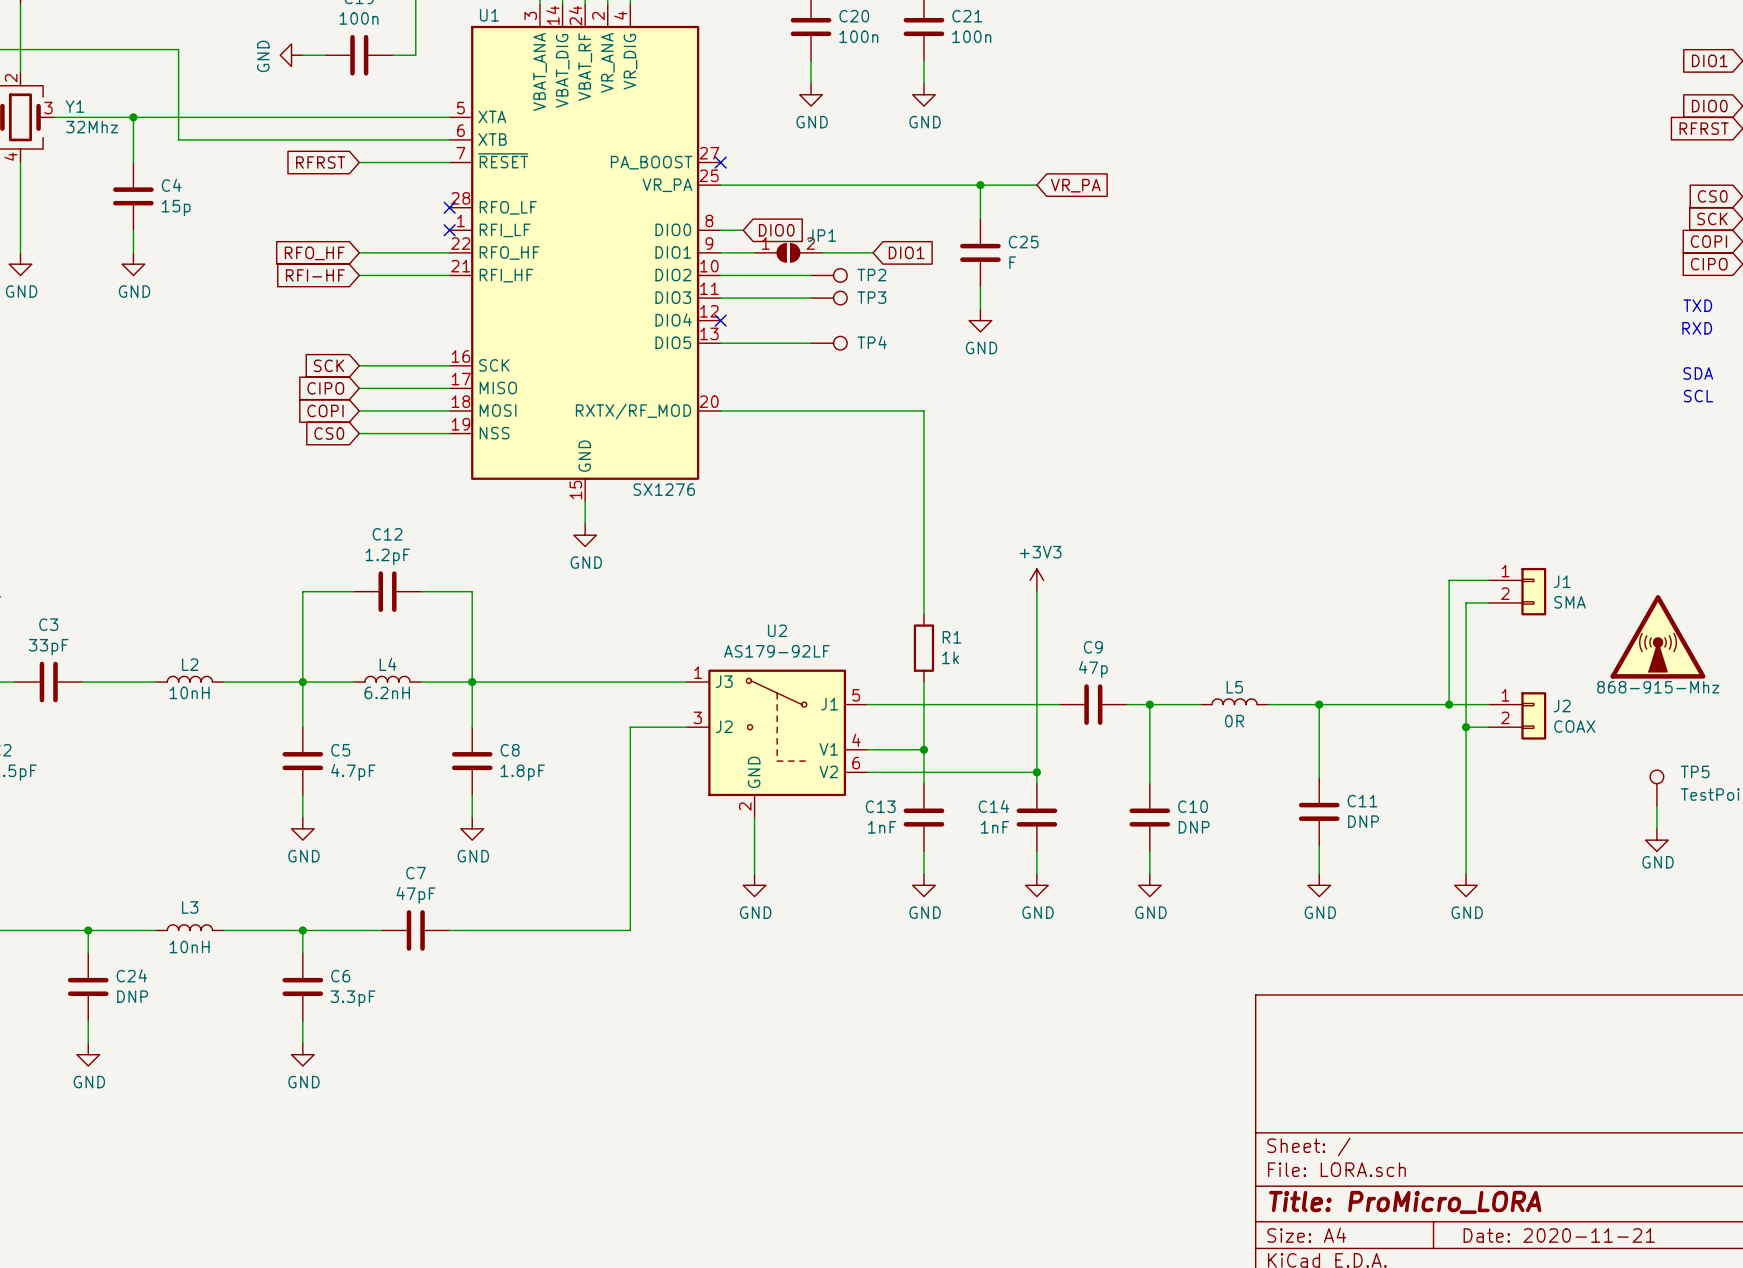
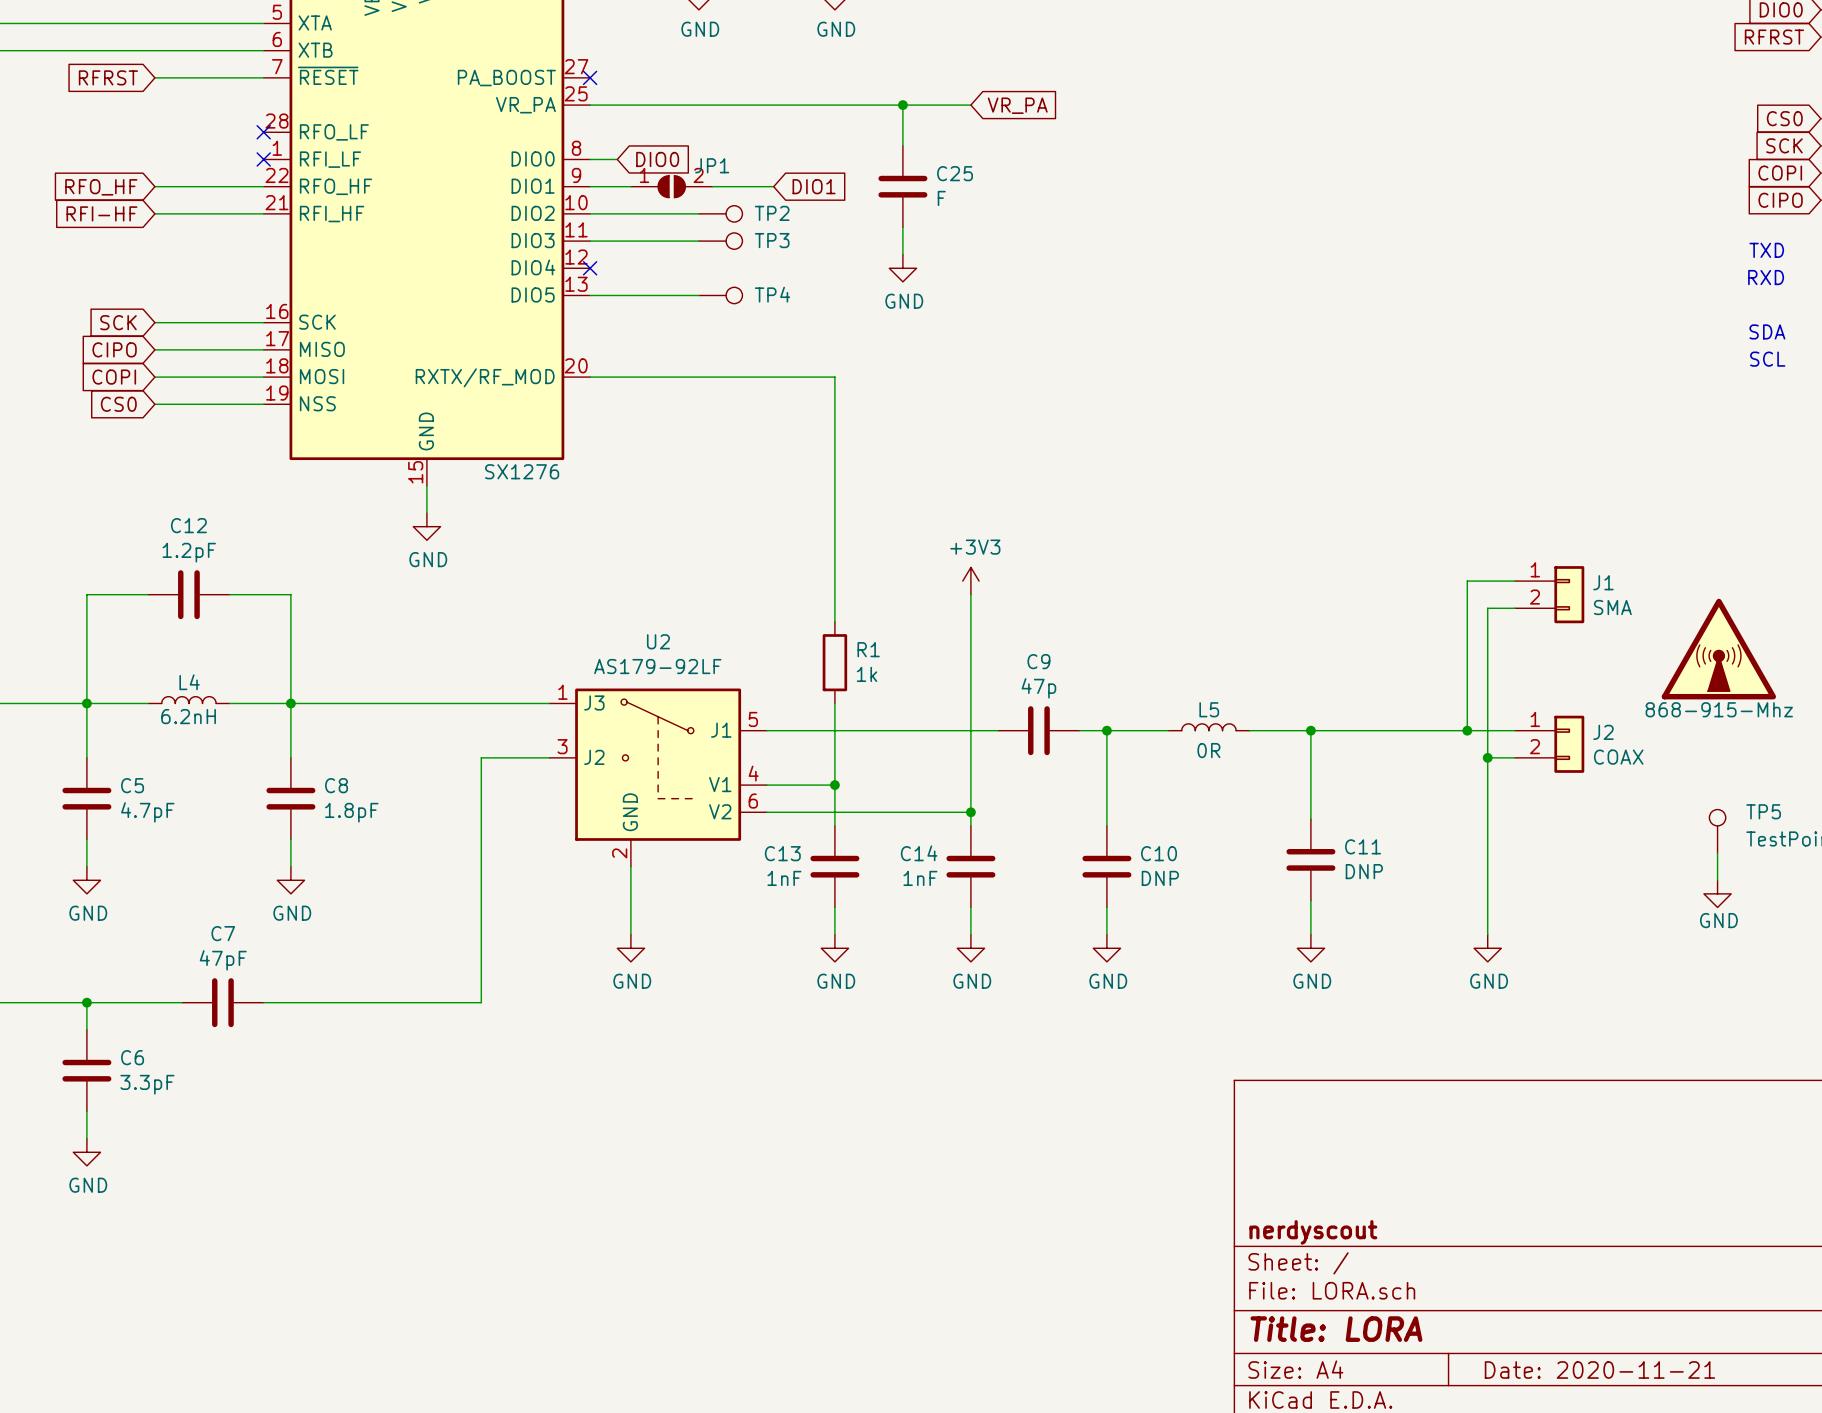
title block: none -> nerdyscout (1313, 1232)
title block: Title: ProMicro_LORA (1405, 1202) -> Title: LORA (1336, 1329)

